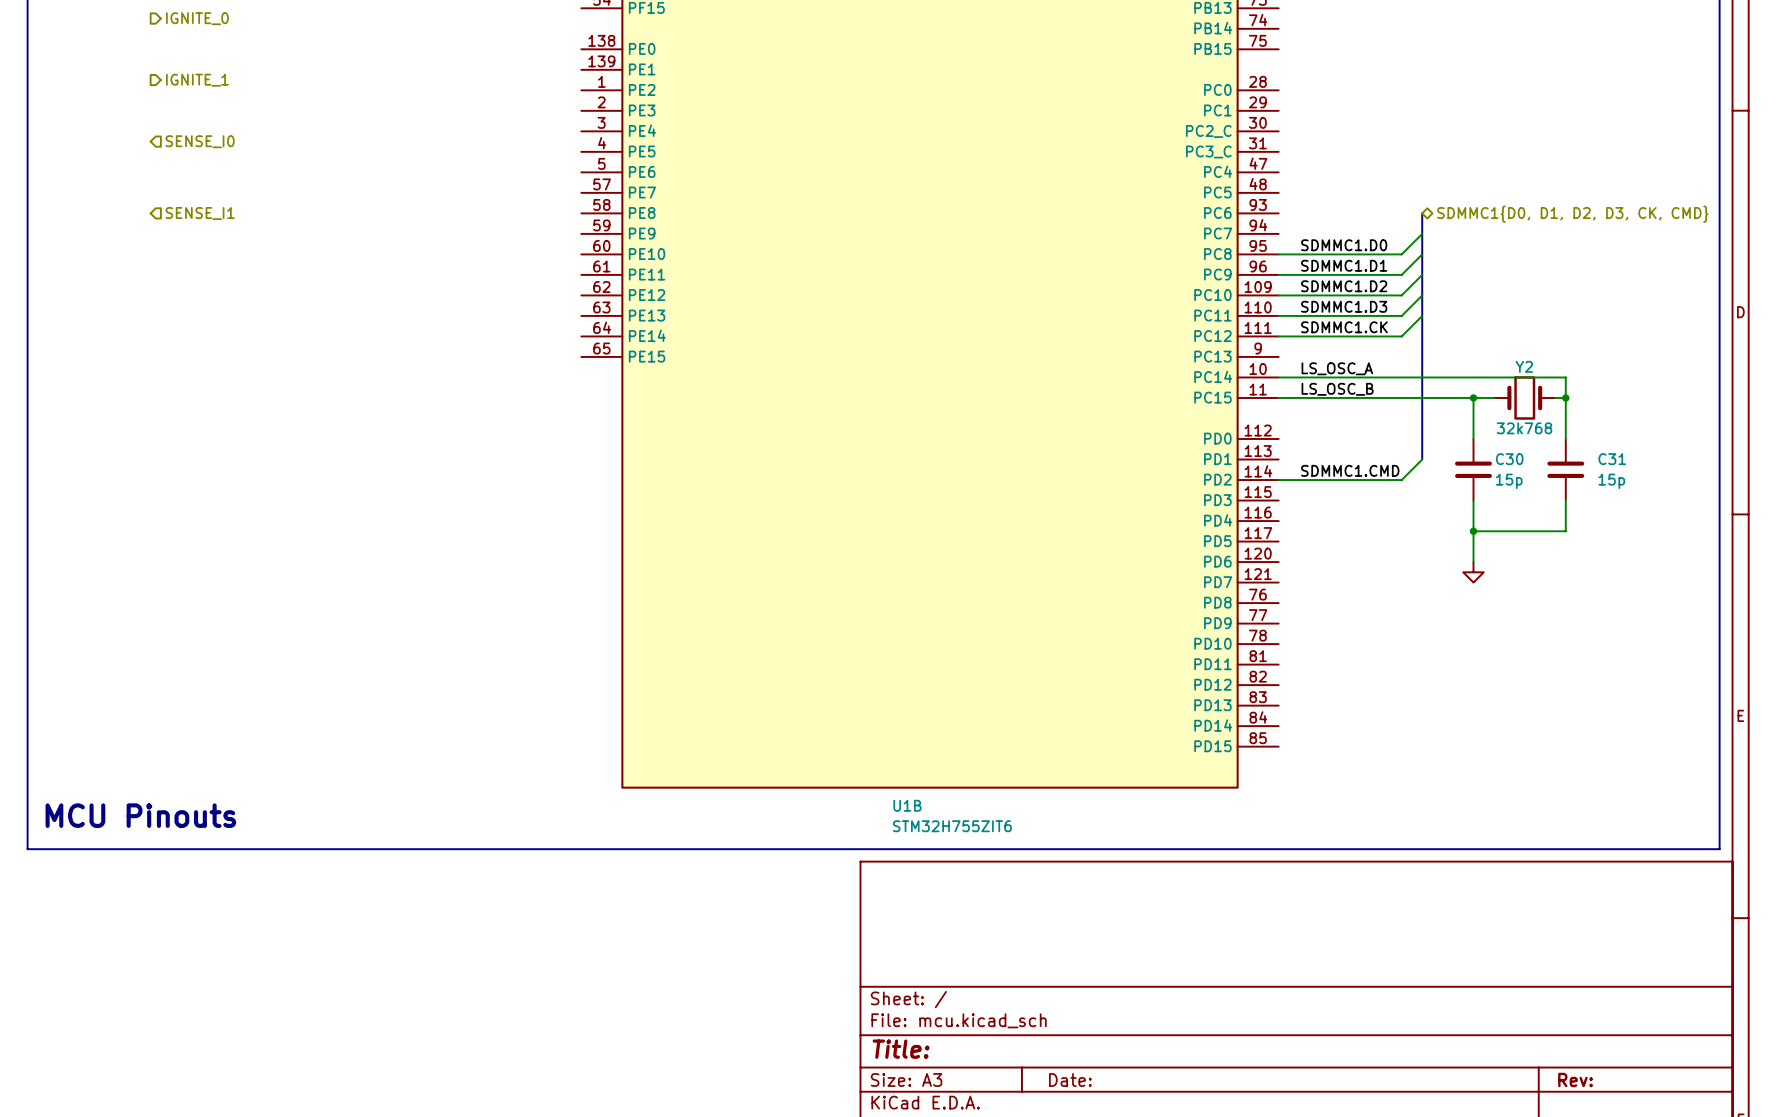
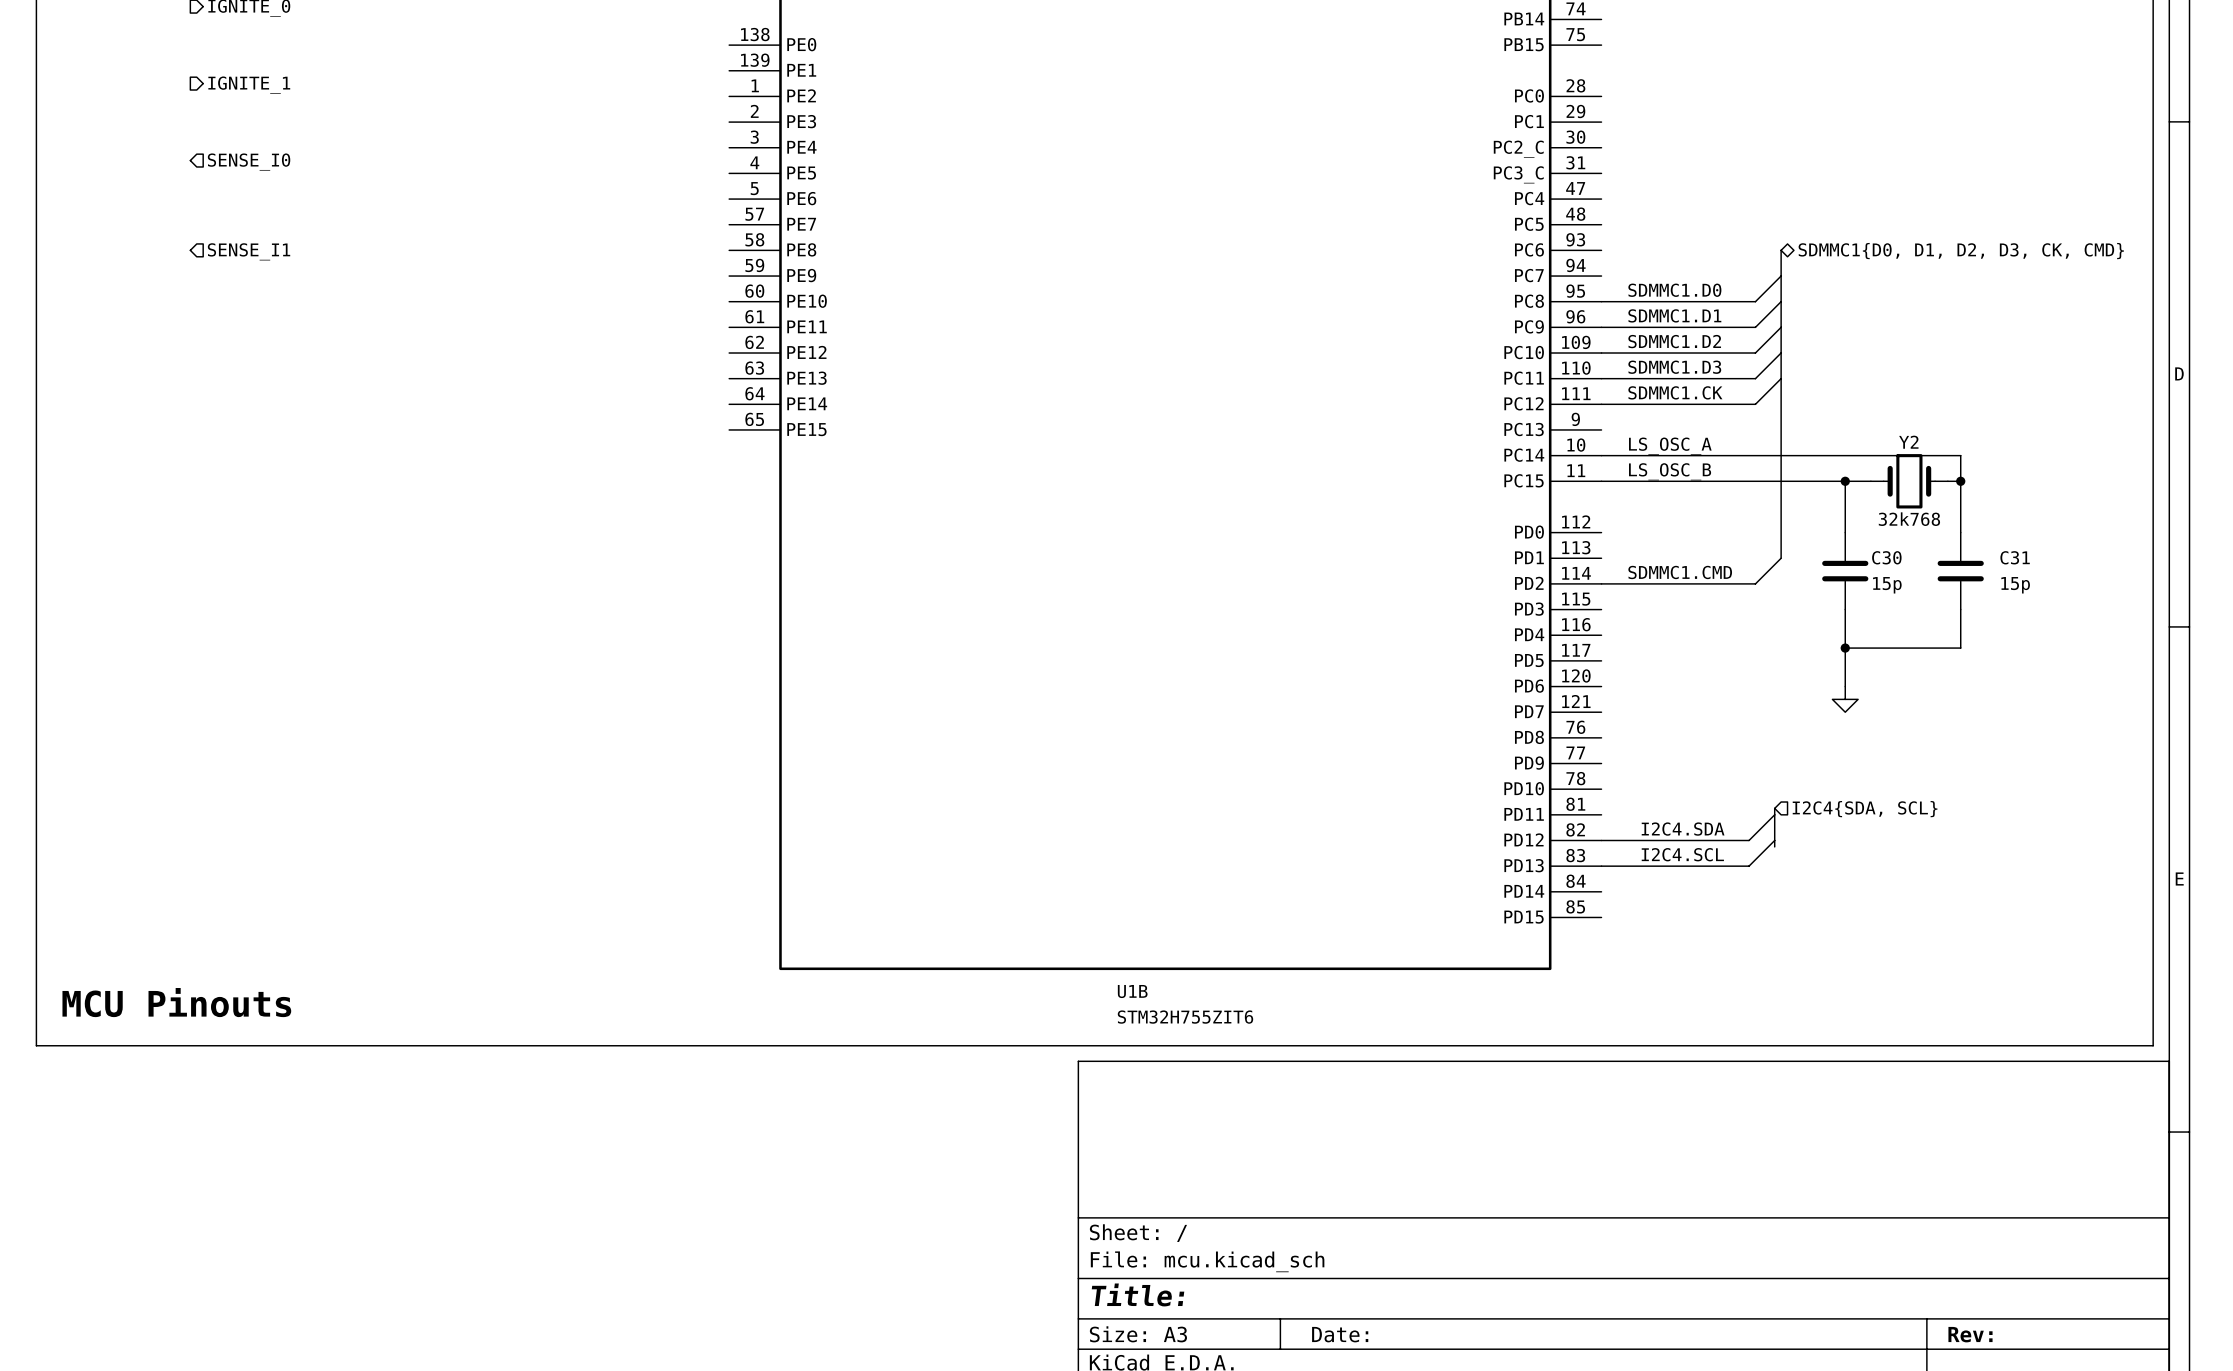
bus: none -> (1774, 808) (1774, 846)
hierarchical label: none -> I2C4{SDA, SCL} (1865, 809)
wire: none -> (1774, 814) (1749, 840) (1601, 840)
label: none -> I2C4.SDA (1683, 829)
wire: none -> (1774, 840) (1749, 866) (1601, 866)
label: none -> I2C4.SCL (1682, 854)

